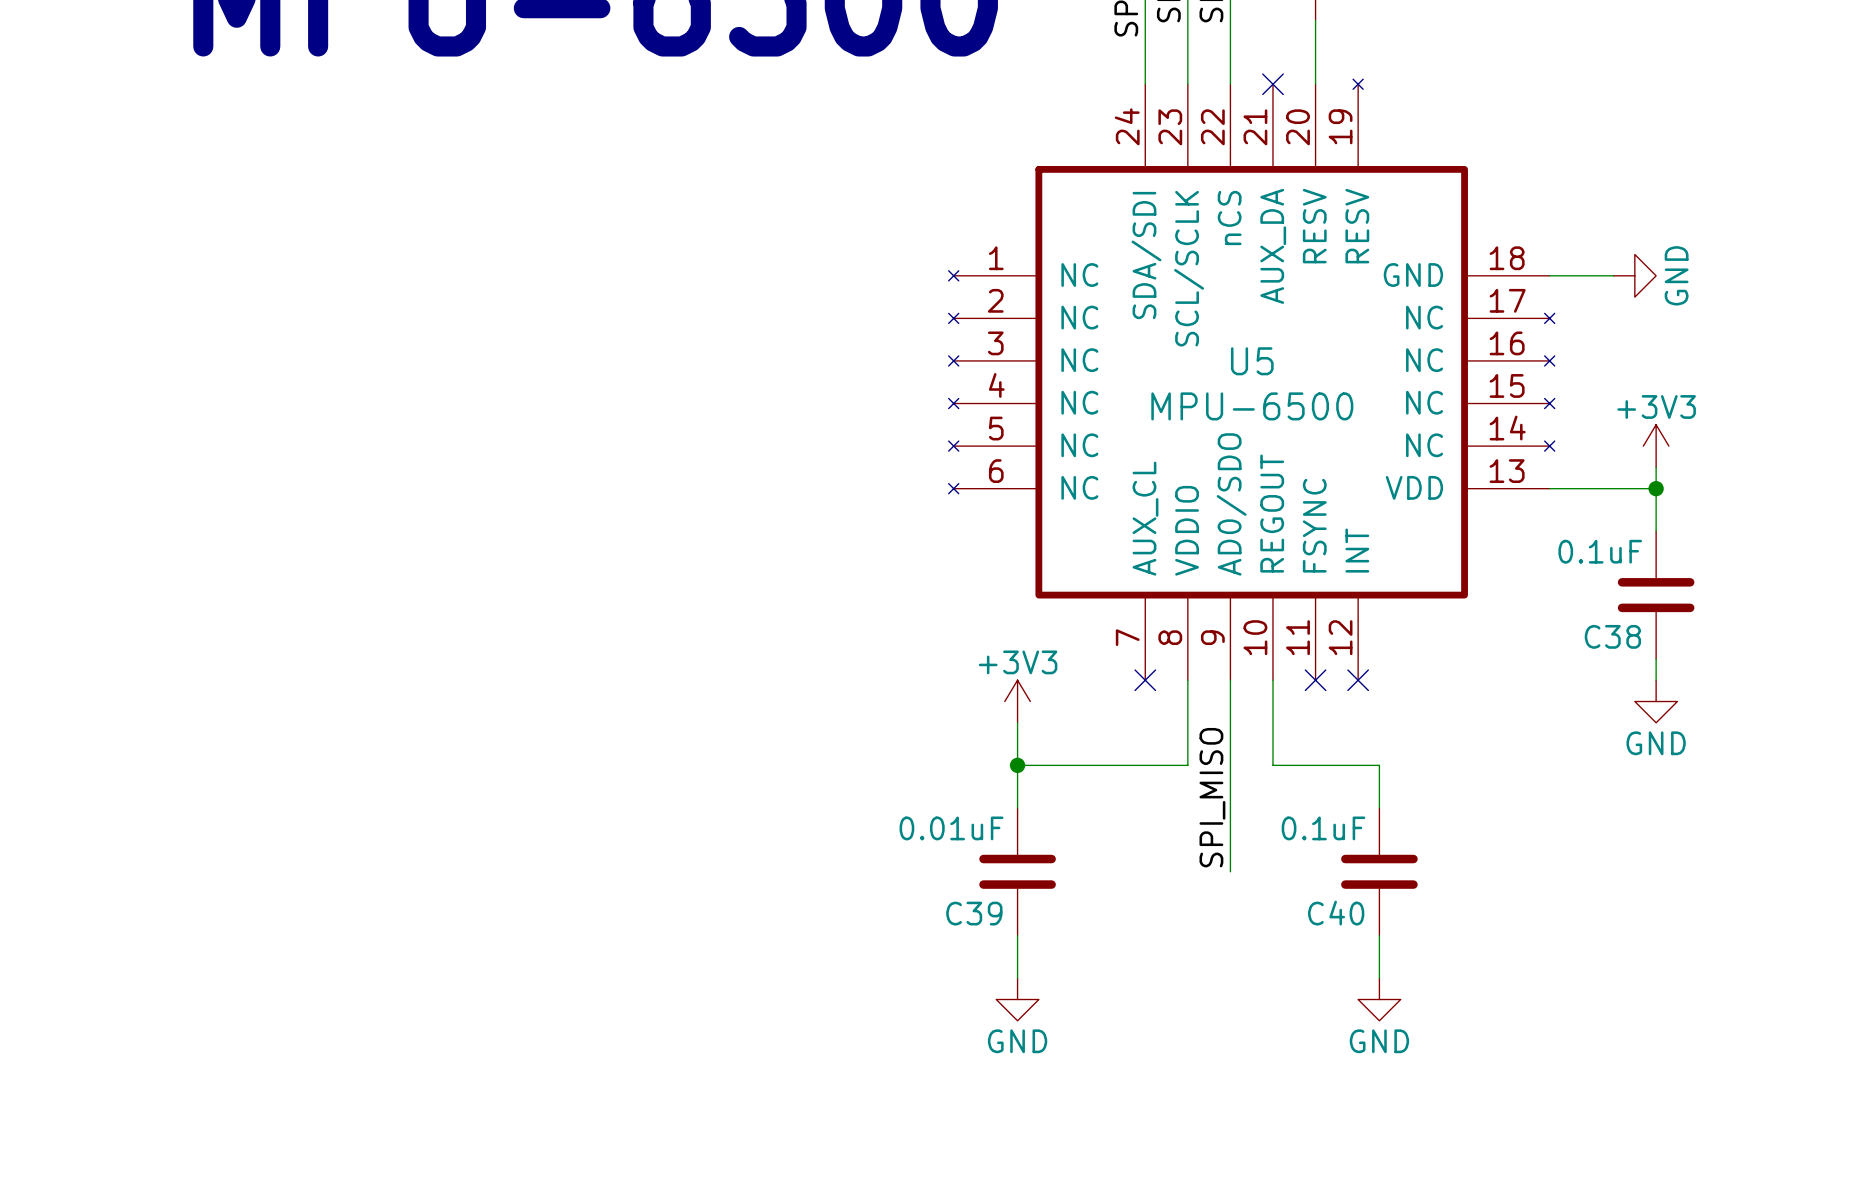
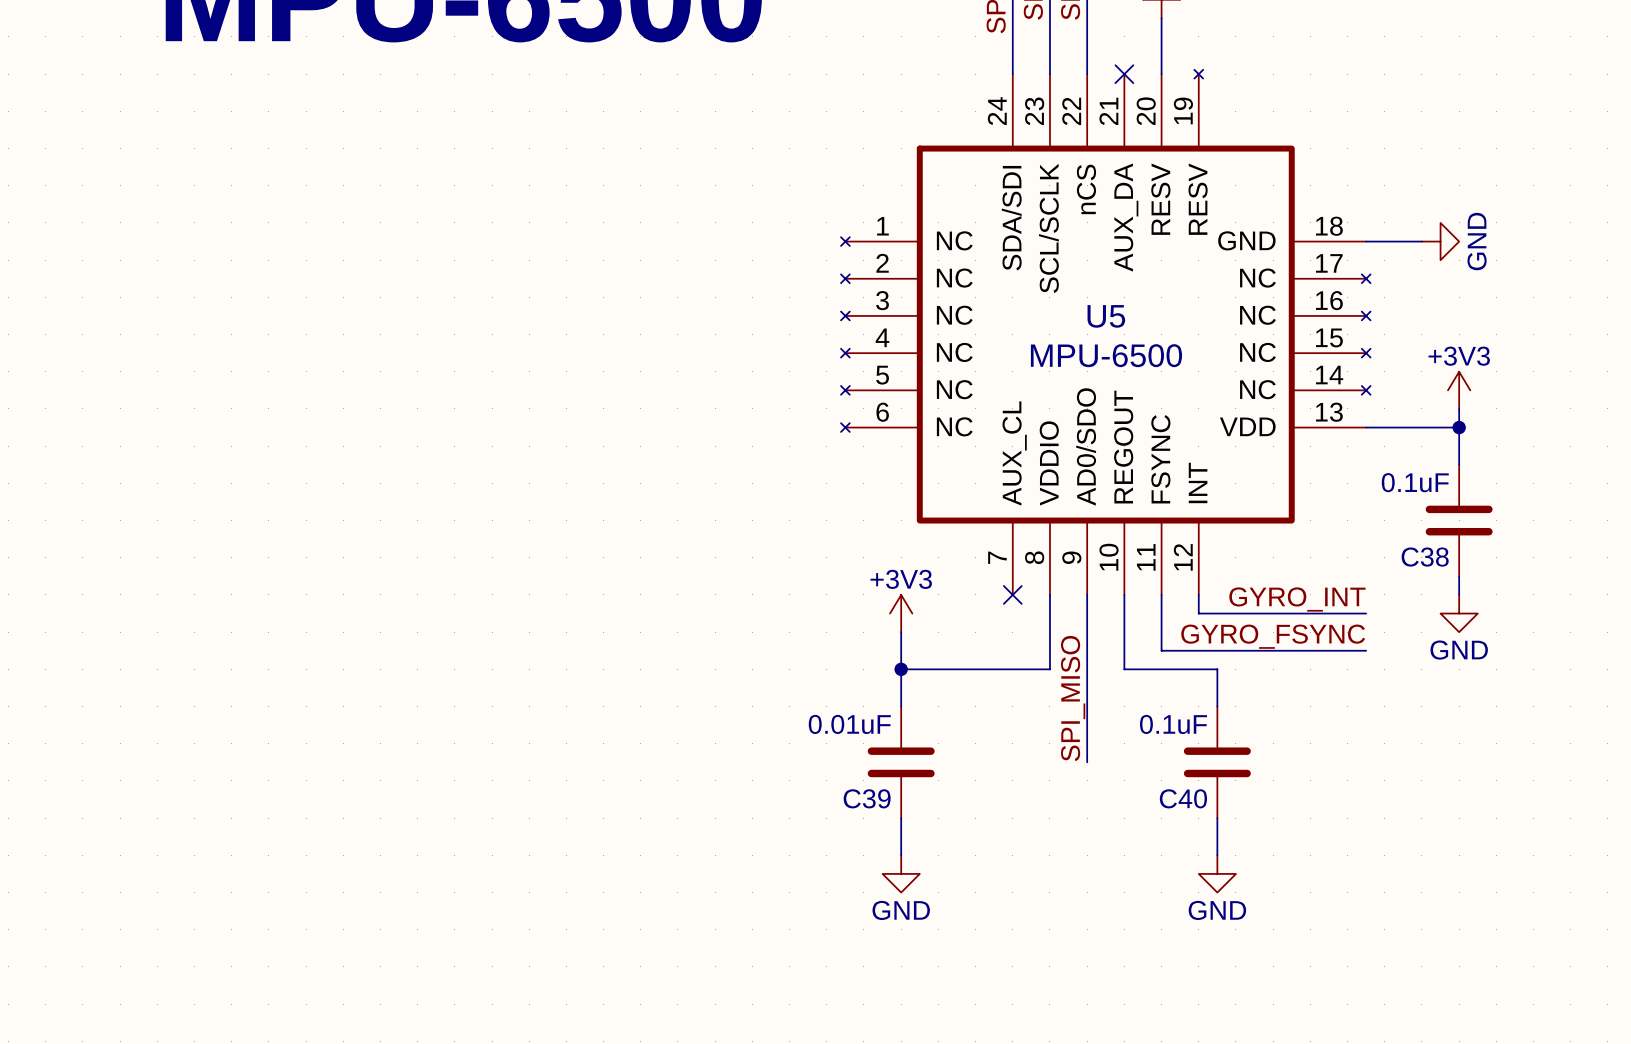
wire: none -> (1161, 594) (1161, 650) (1366, 650)
no-connect mark: (1315, 680) -> none
wire: none -> (1198, 594) (1198, 613) (1366, 613)
no-connect mark: (1358, 680) -> none
label: none -> GYRO_INT (1297, 599)
label: none -> GYRO_FSYNC (1273, 636)

